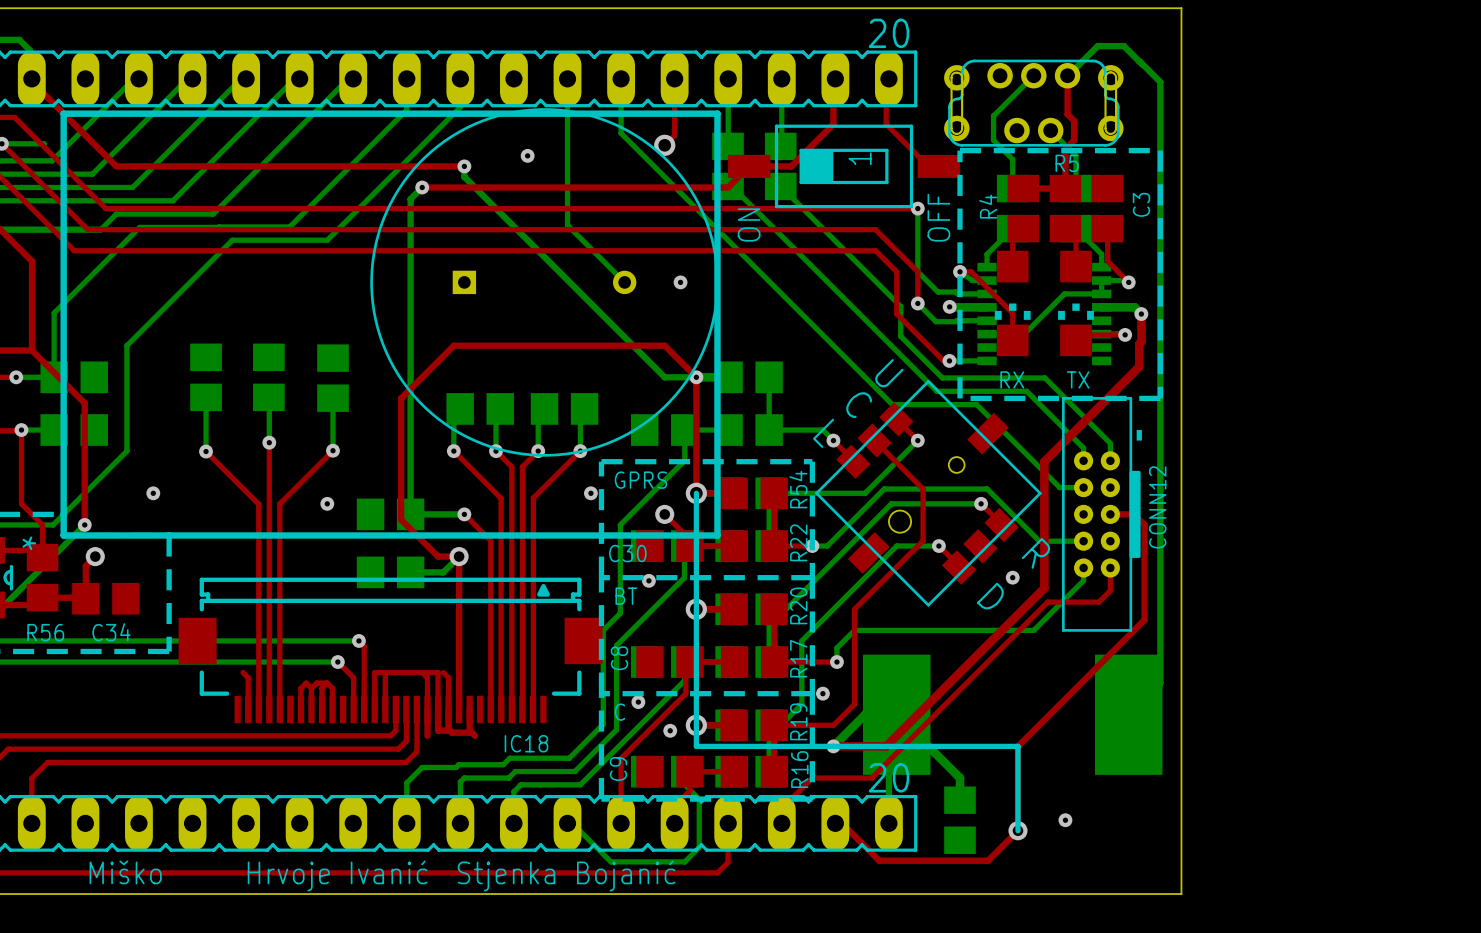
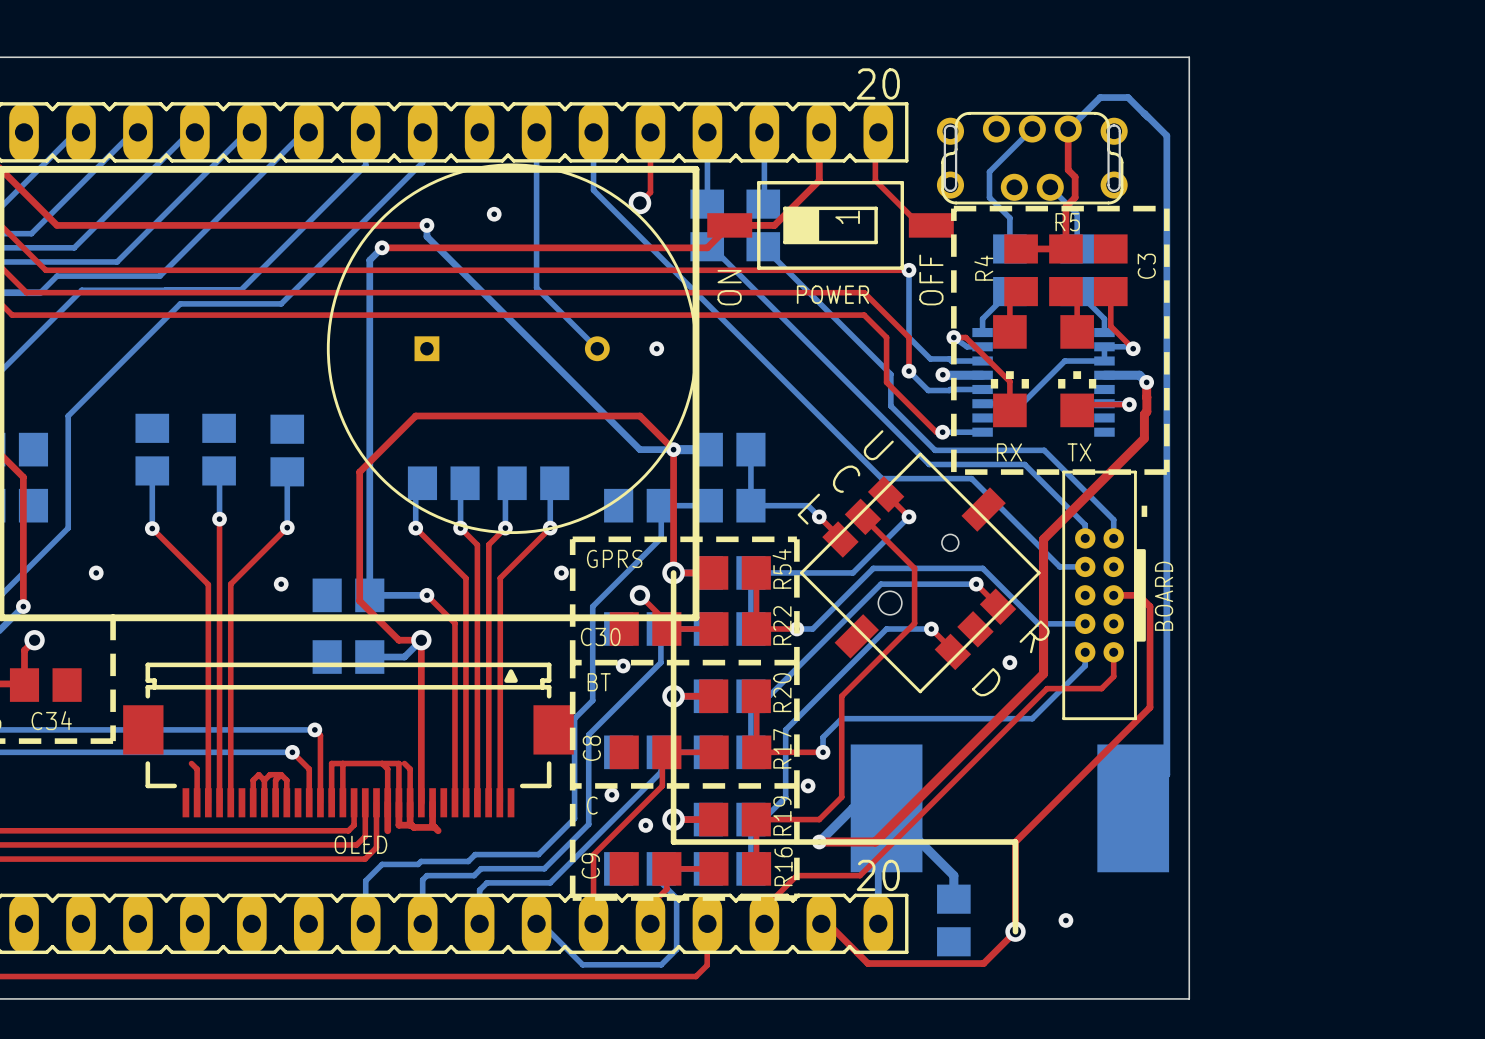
POWER name: none -> POWER (832, 294)
CONN12 name: CONN12 (1157, 507) -> BOARD (1164, 596)
IC18 name: IC18 (526, 743) -> OLED (360, 844)
text: Miško (125, 872) -> none
text: Hrvoje Ivanić (337, 875) -> none
text: Stjenka Bojanić (566, 875) -> none

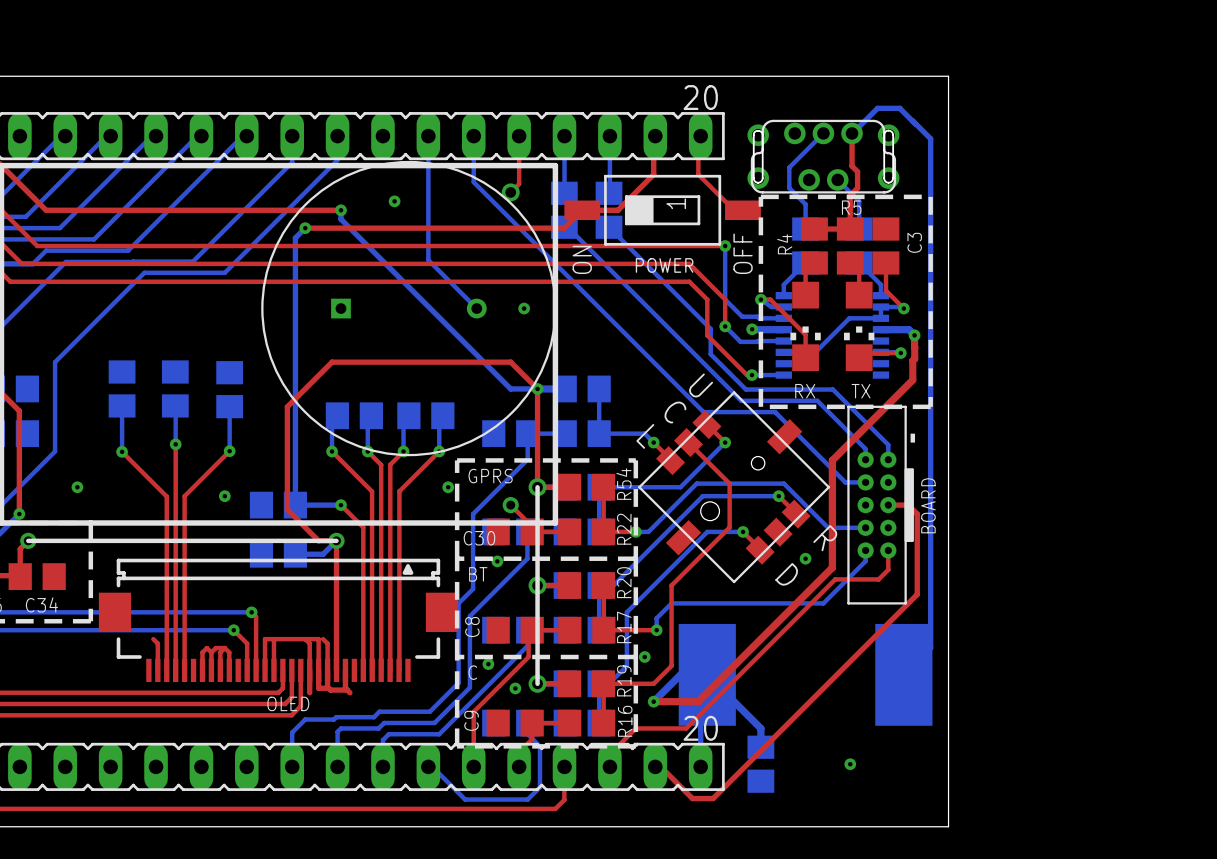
line: none -> (28, 540) (336, 540)
line: (673, 819) (673, 842) (1015, 842) (1015, 931) -> none
top track: (1015, 842) (1015, 931) (983, 963) (893, 963) -> (810, 701) (713, 798)
via: (1015, 931) -> none

